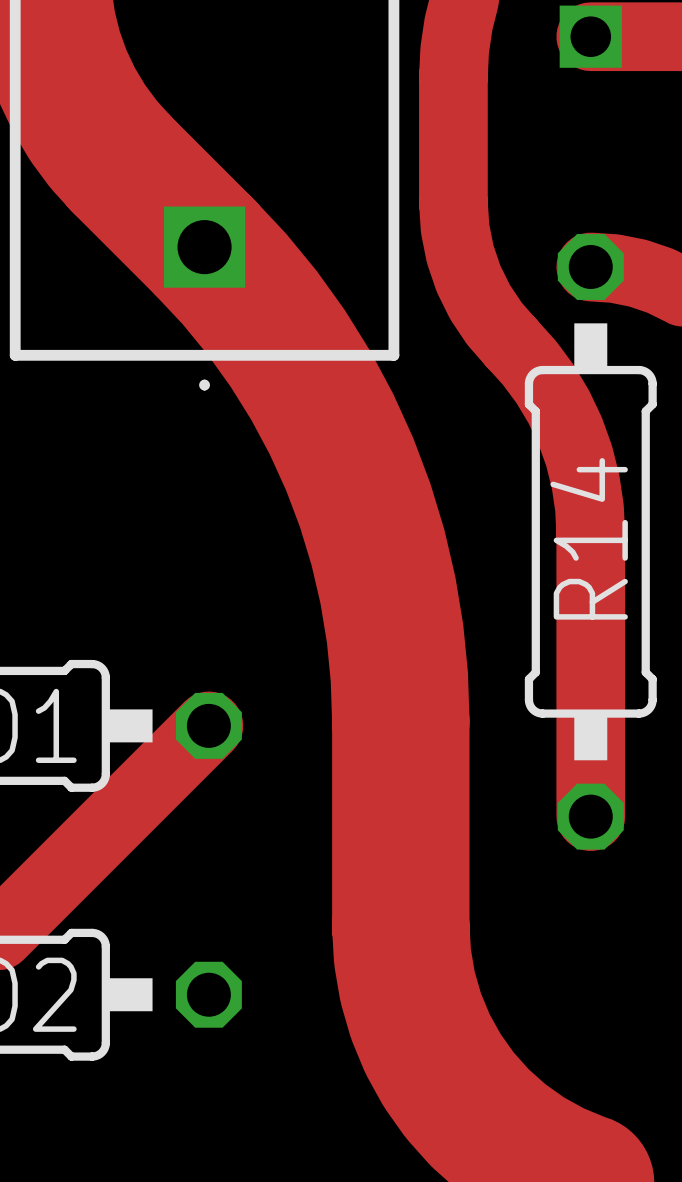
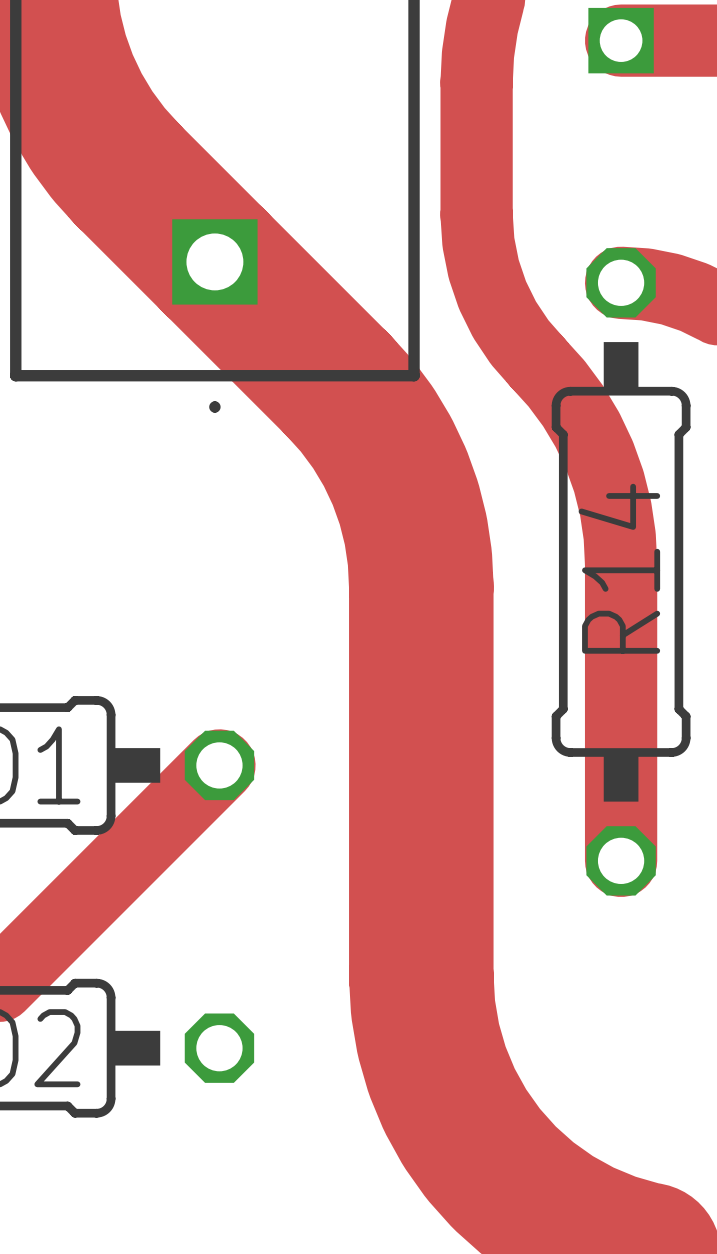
track: (204, 247) (234, 279) (287, 348) (331, 424) (349, 464) (377, 547) (387, 590) (399, 677) (400, 720) -> (214, 261) (356, 405) (373, 428) (399, 477) (409, 503) (419, 558) (421, 760)

